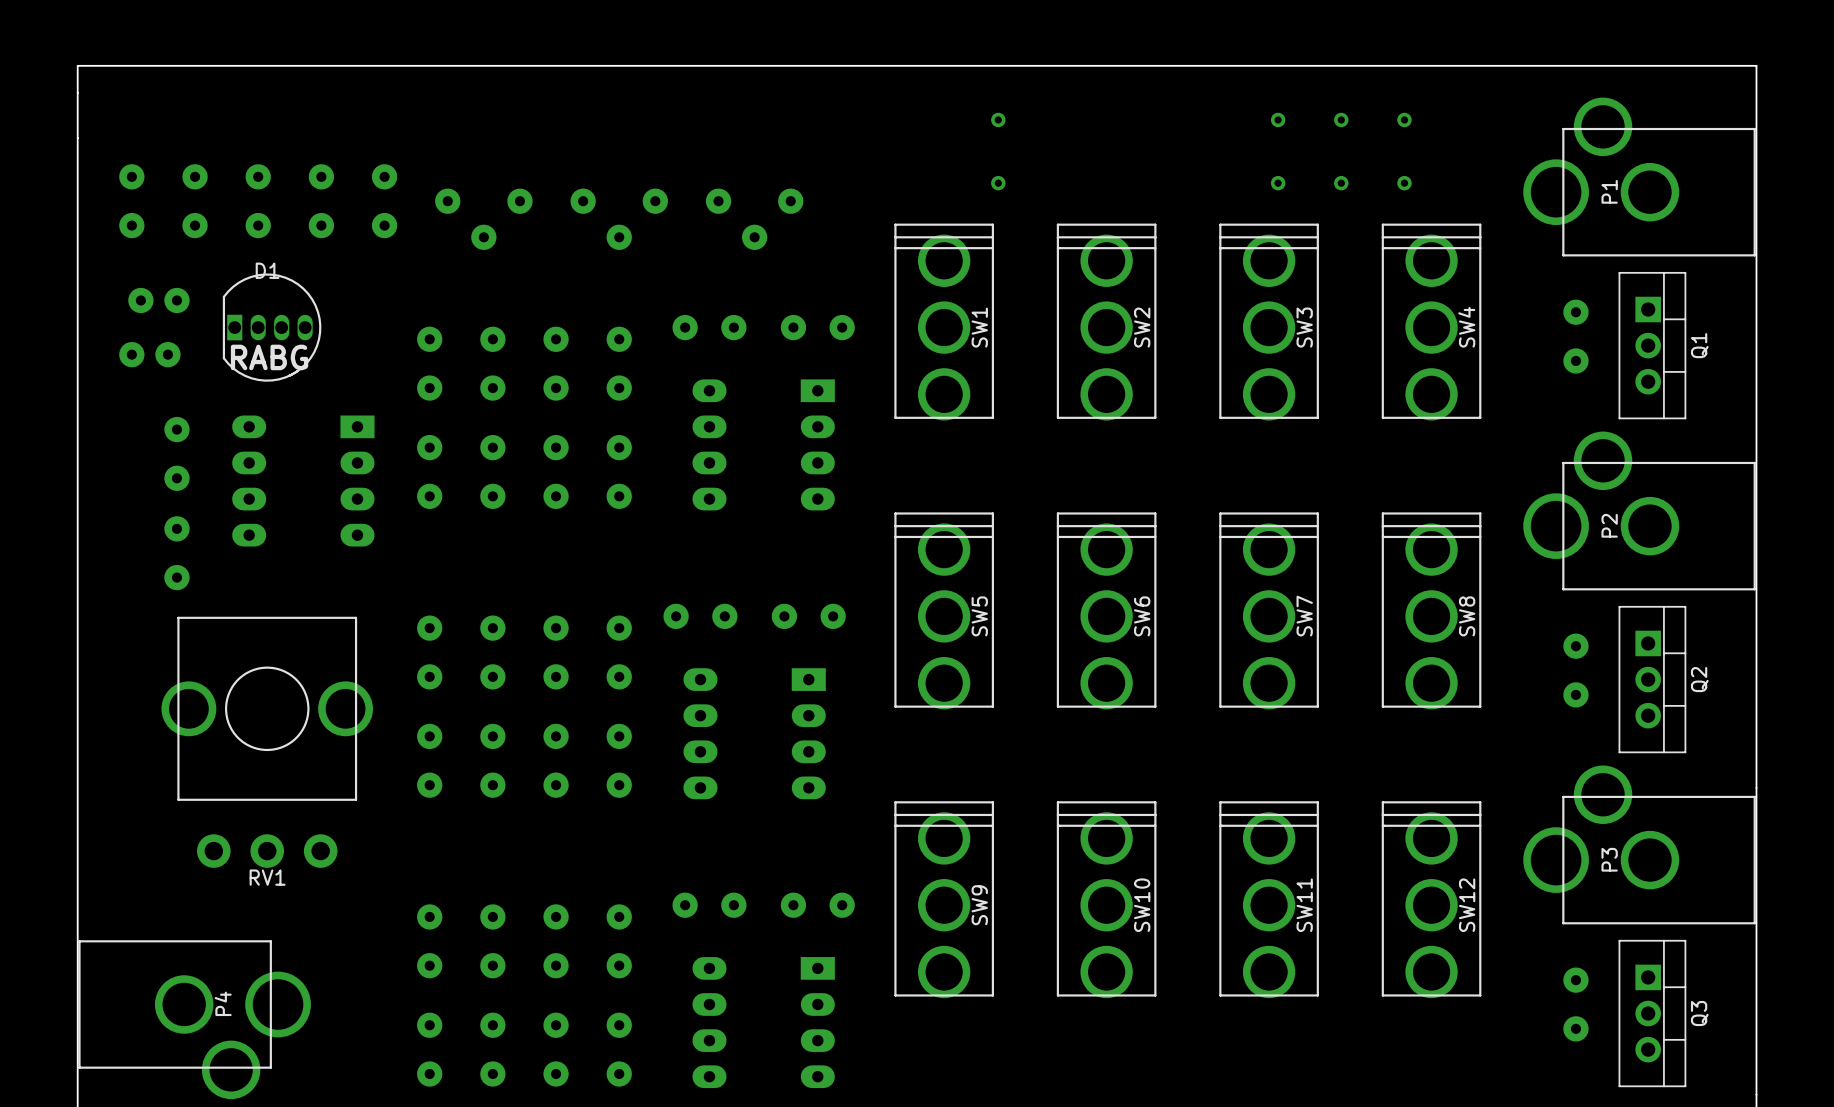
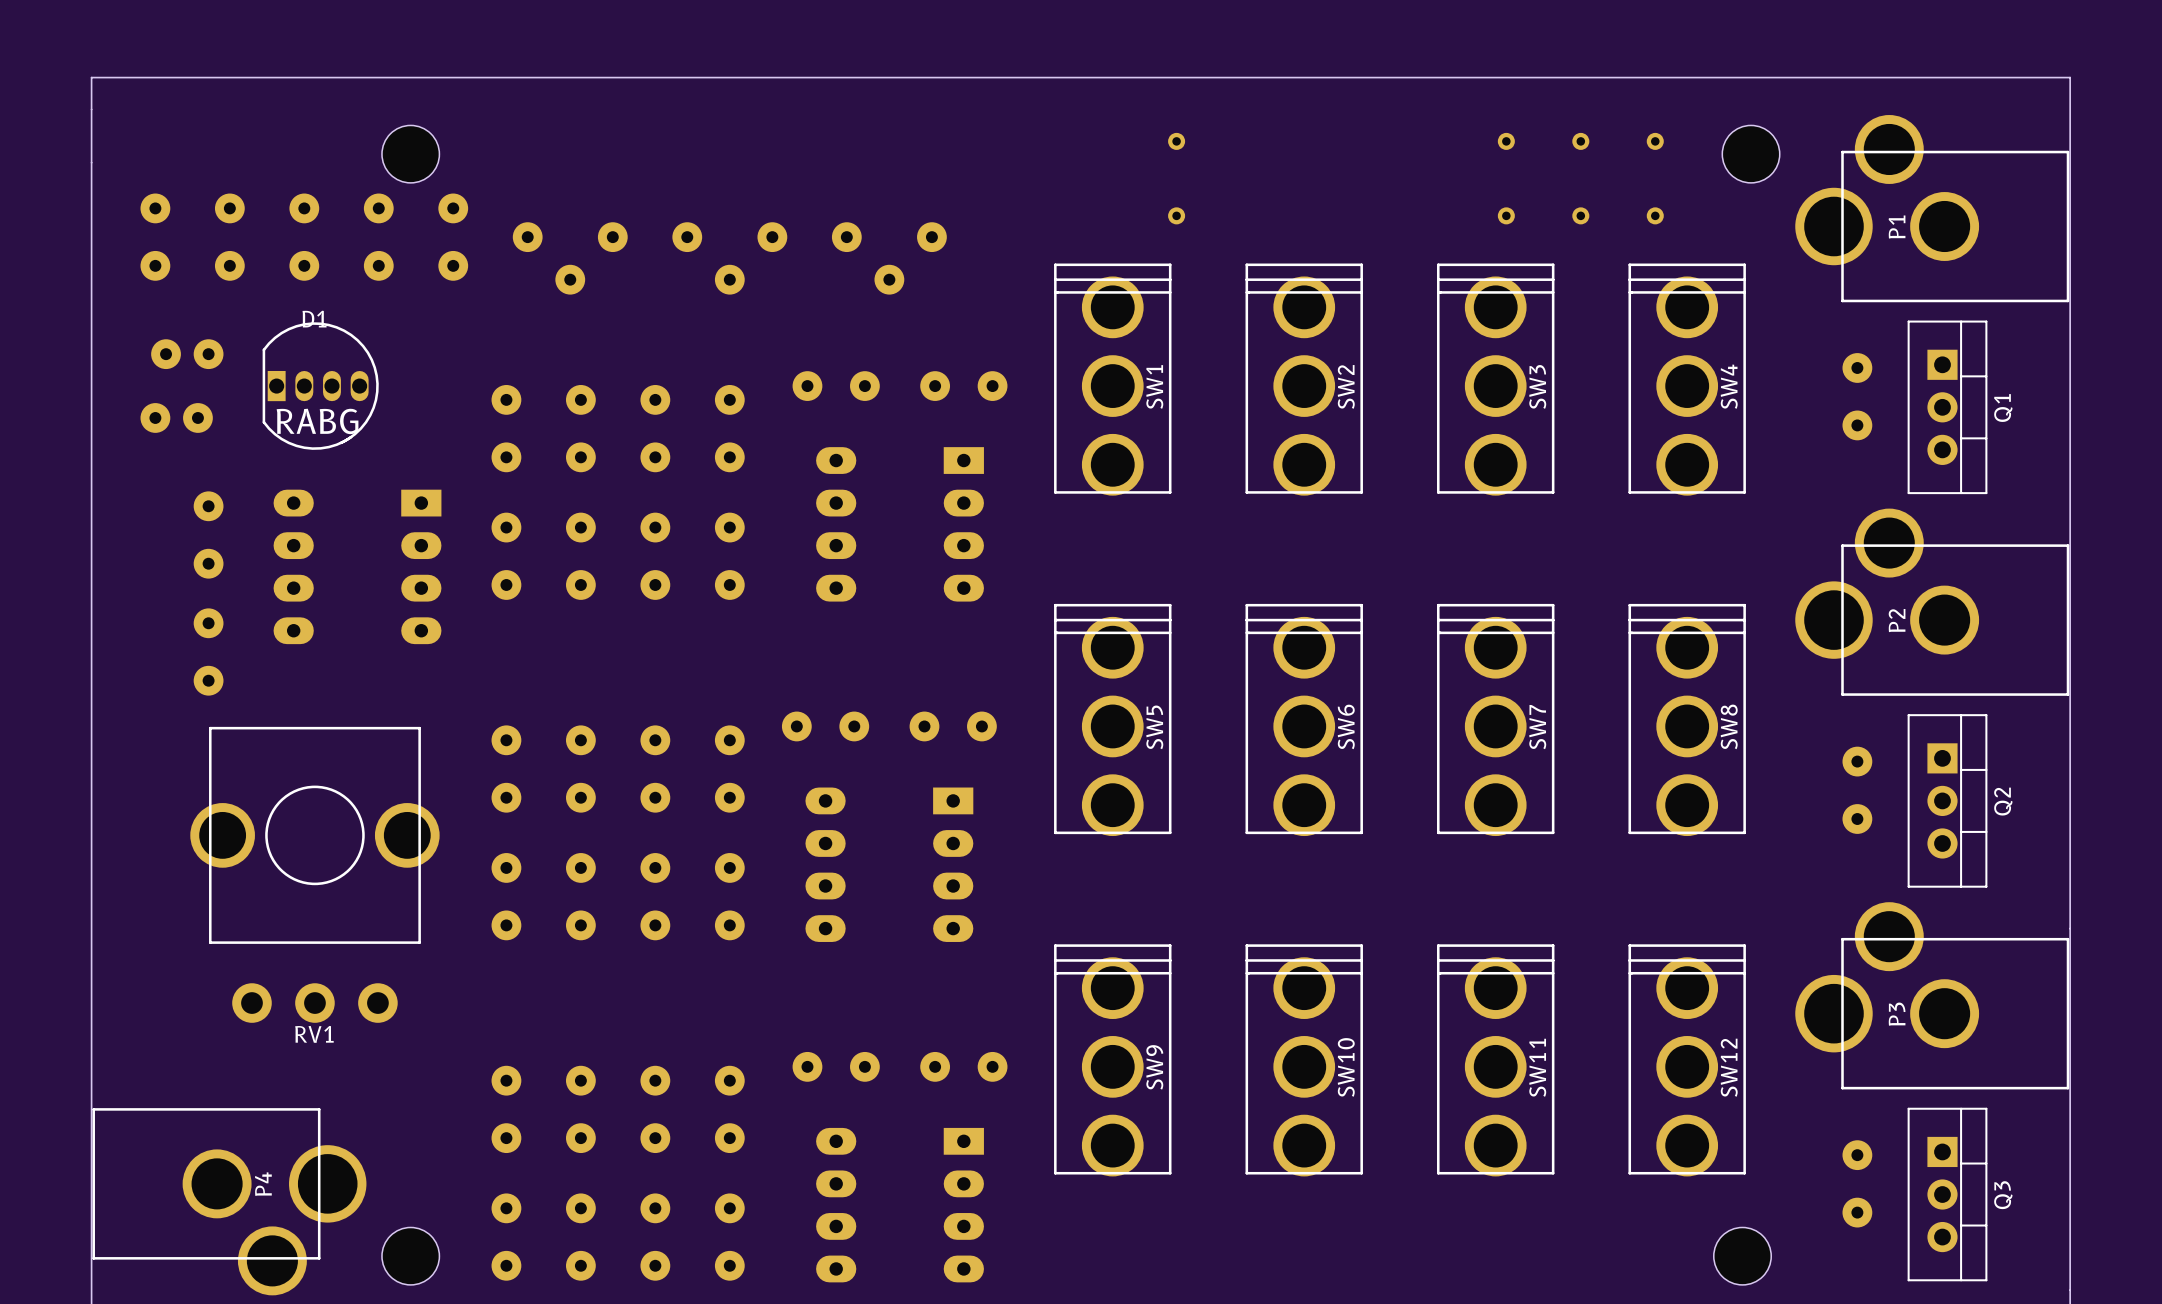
part: none -> (410, 154)
part: none -> (1751, 154)
part: none -> (410, 1256)
part: none -> (1742, 1256)

